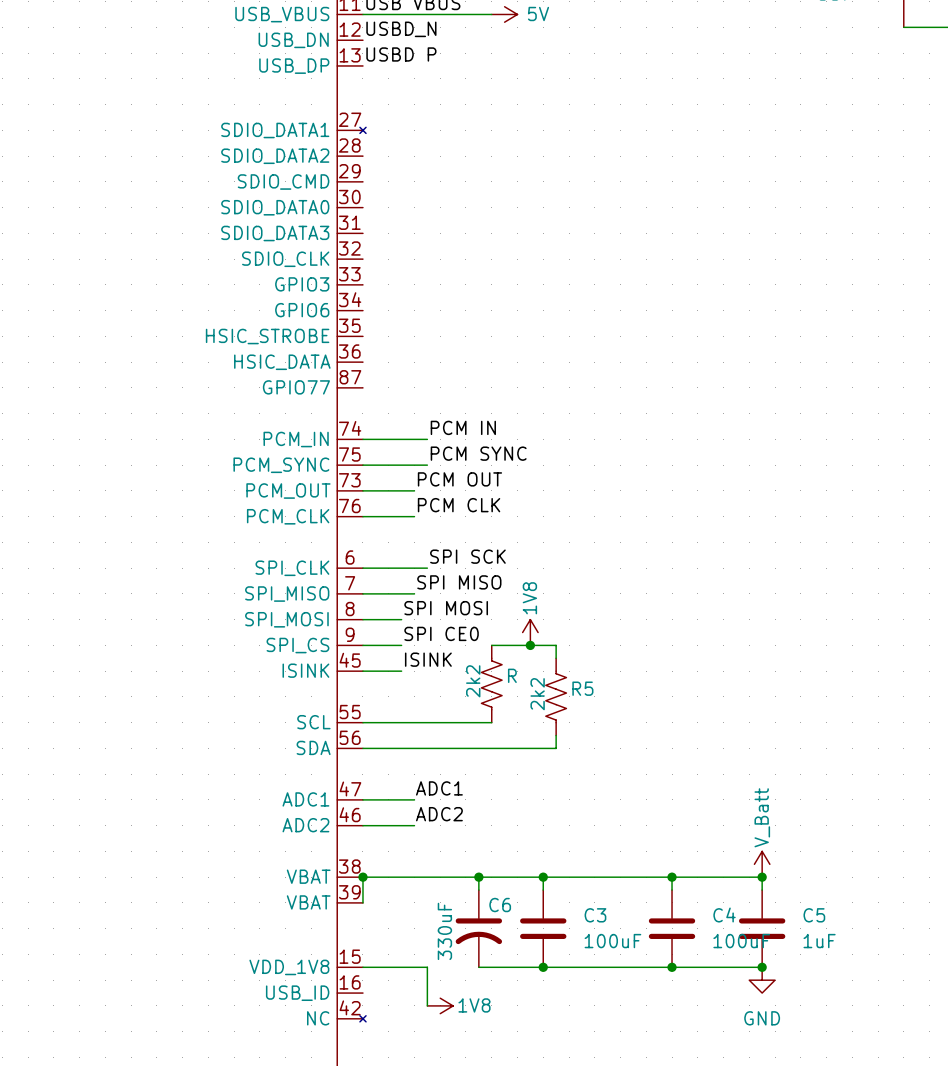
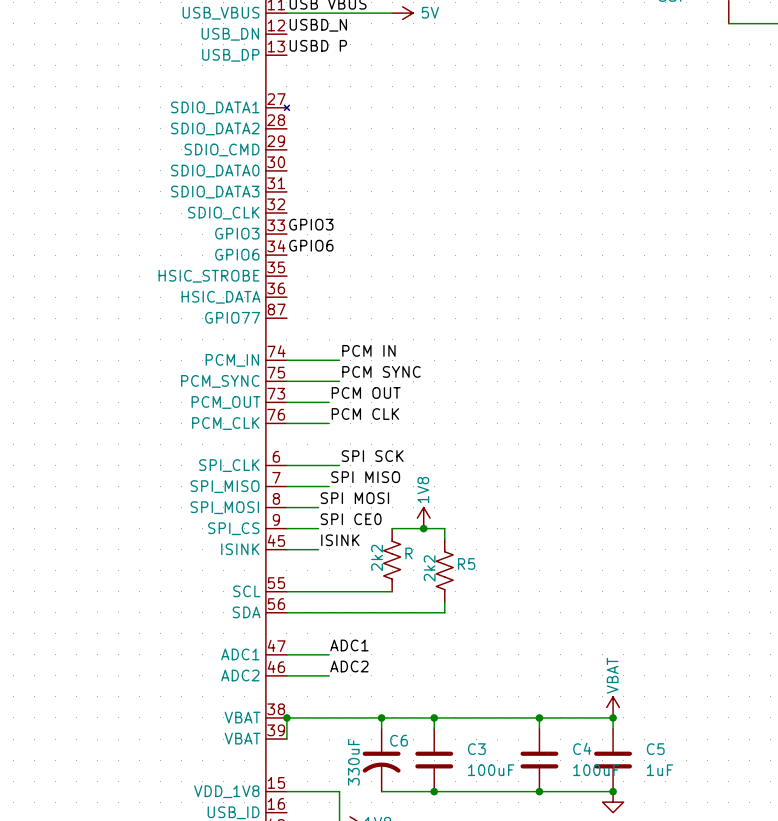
label: none -> GPIO3 (311, 224)
label: none -> GPIO6 (311, 245)
power symbol: V_Batt (762, 864) -> VBAT (613, 707)

